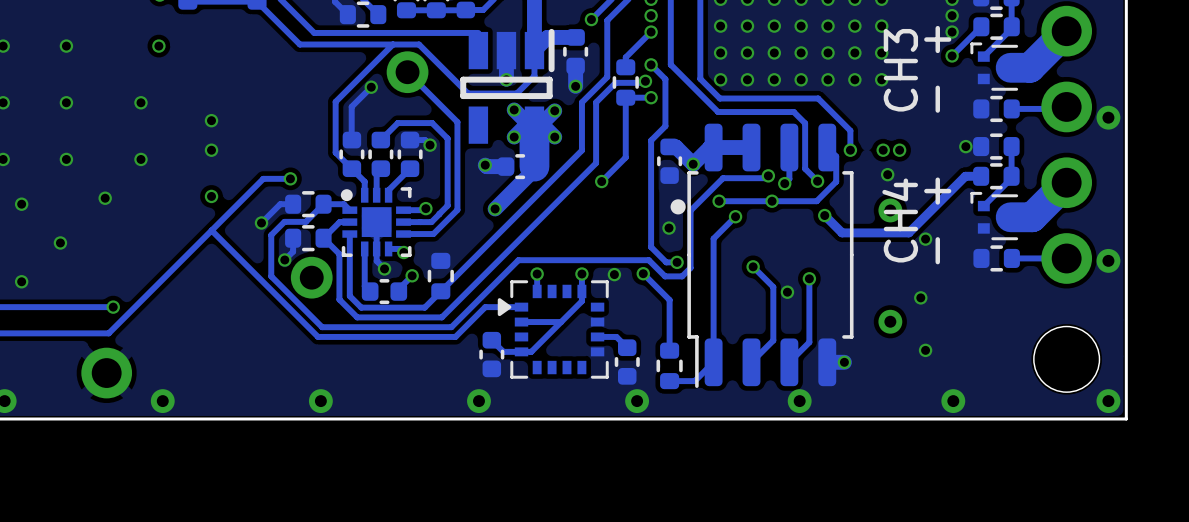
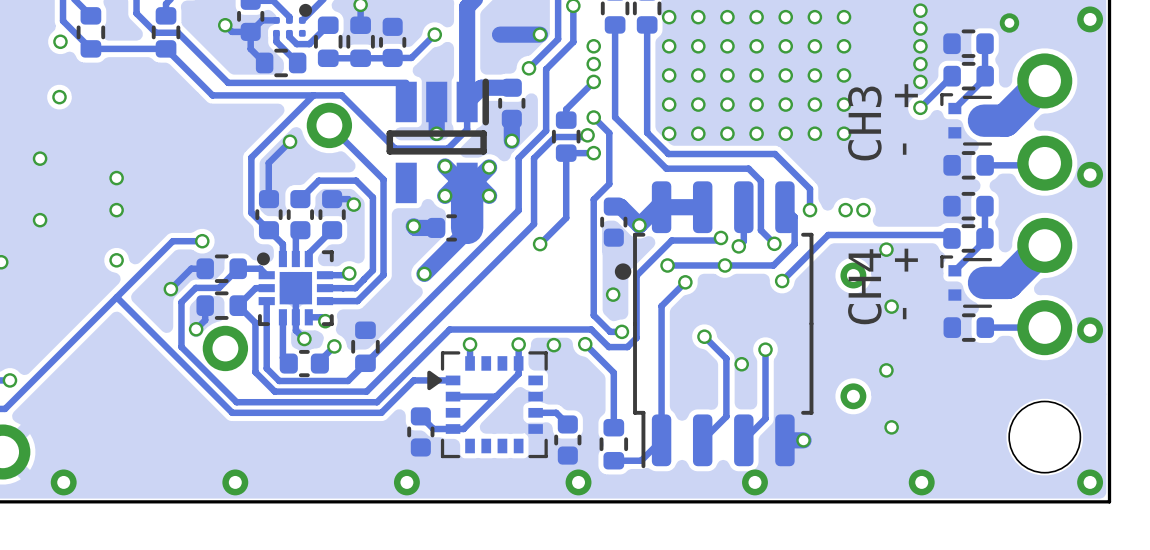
via: (965, 146) -> none
via: (887, 174) -> none
track: (981, 176) (965, 176) (908, 232) (842, 232) (824, 215) -> (951, 238) (948, 234) (828, 234) (782, 281)
via: none -> (886, 249)

